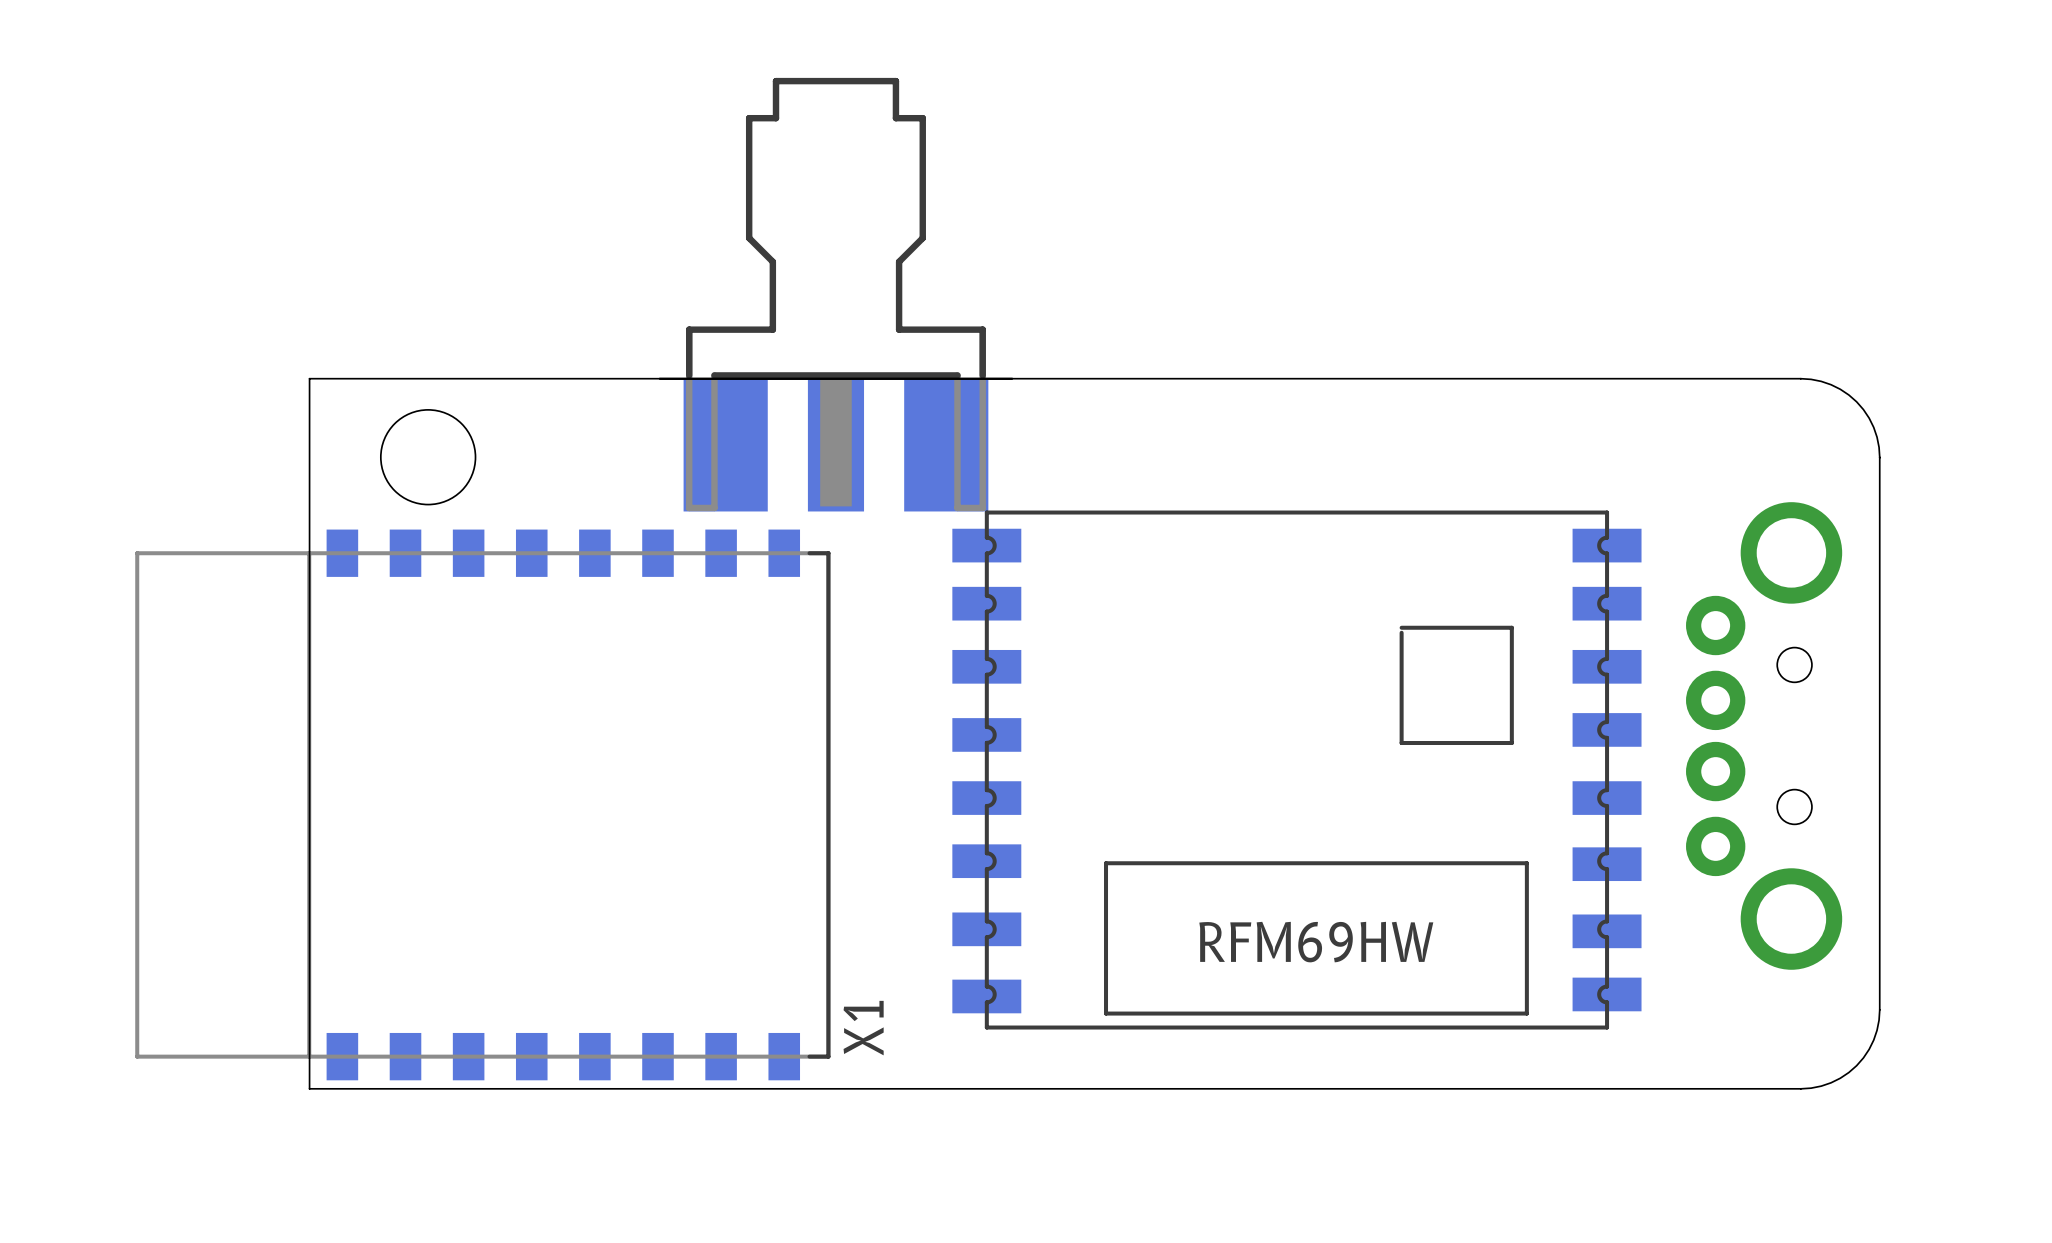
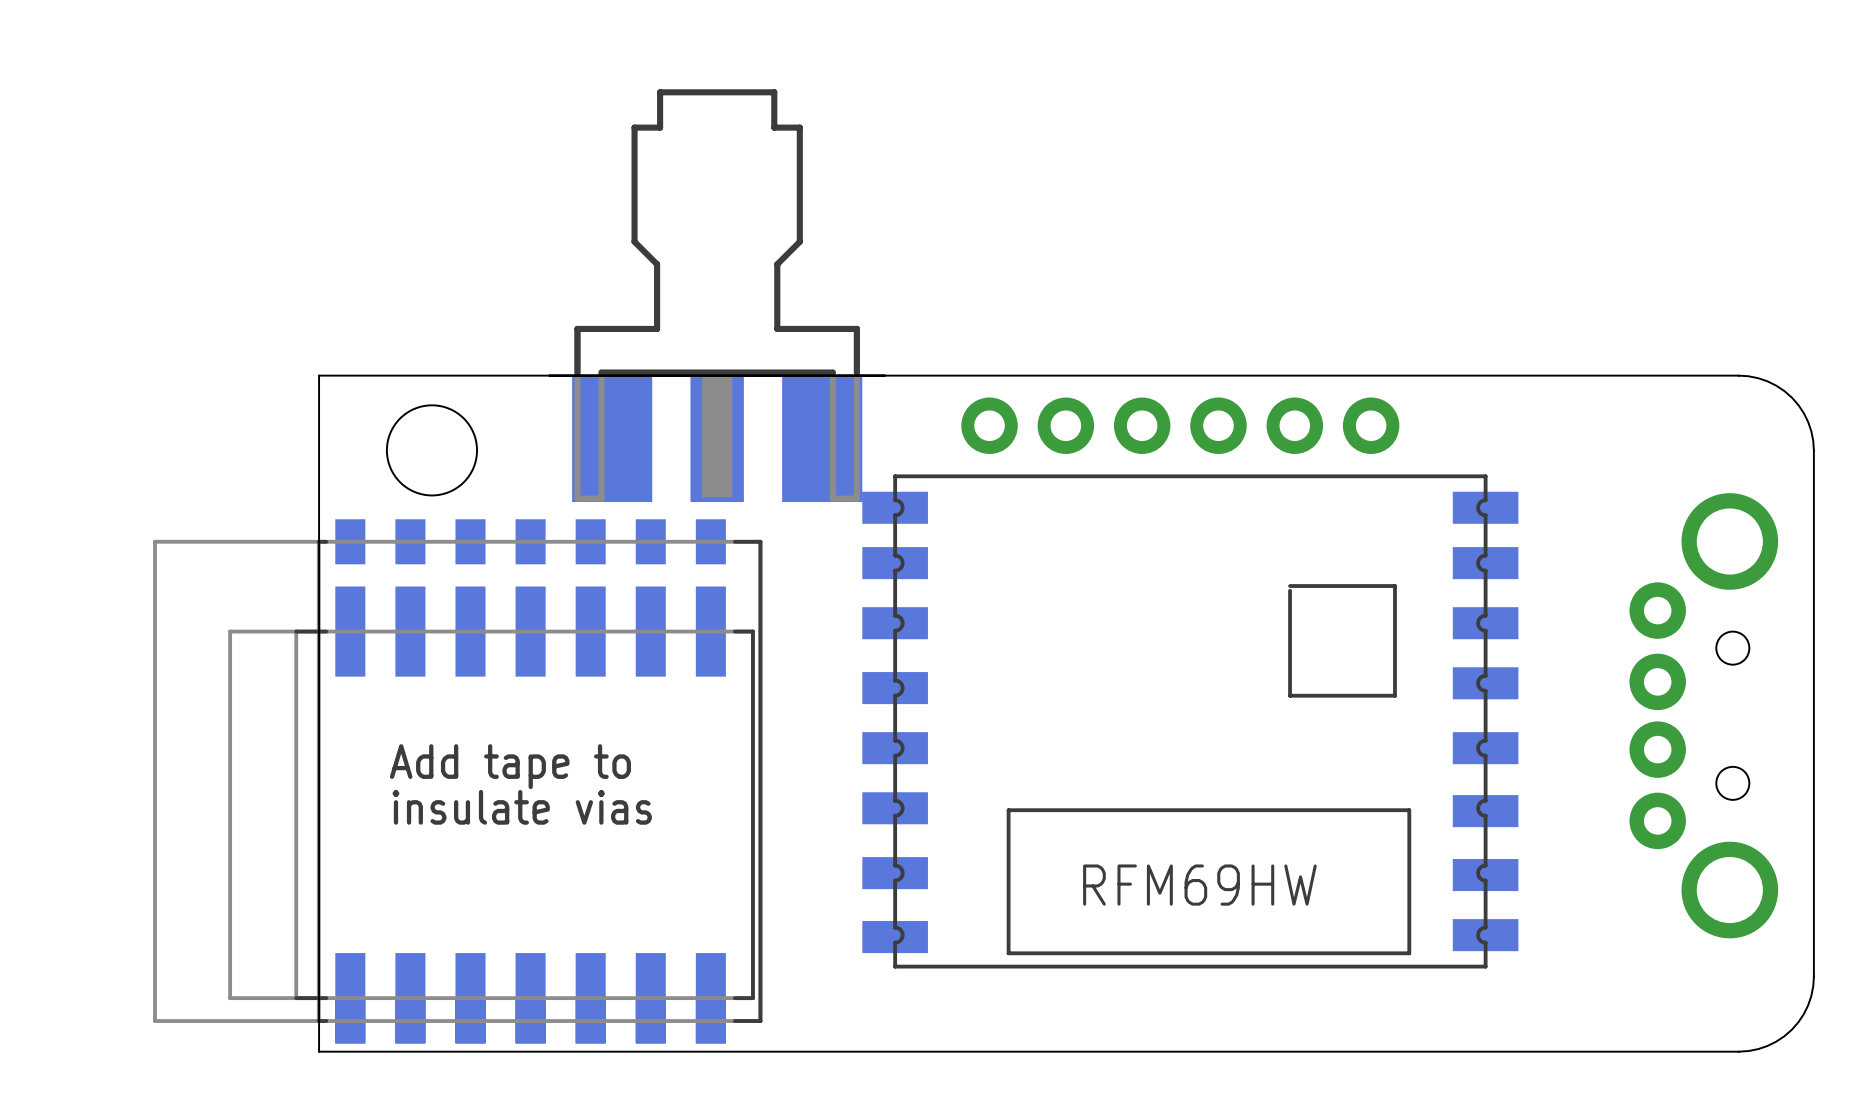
part position: (835, 294) -> (717, 295)
part: none -> (1180, 425)
part position: (1296, 770) -> (1190, 721)
text: none -> Add tape to (510, 766)
part: none -> (457, 781)
X1: (482, 804) -> none
text: none -> insulate vias (522, 807)
part: none -> (491, 814)

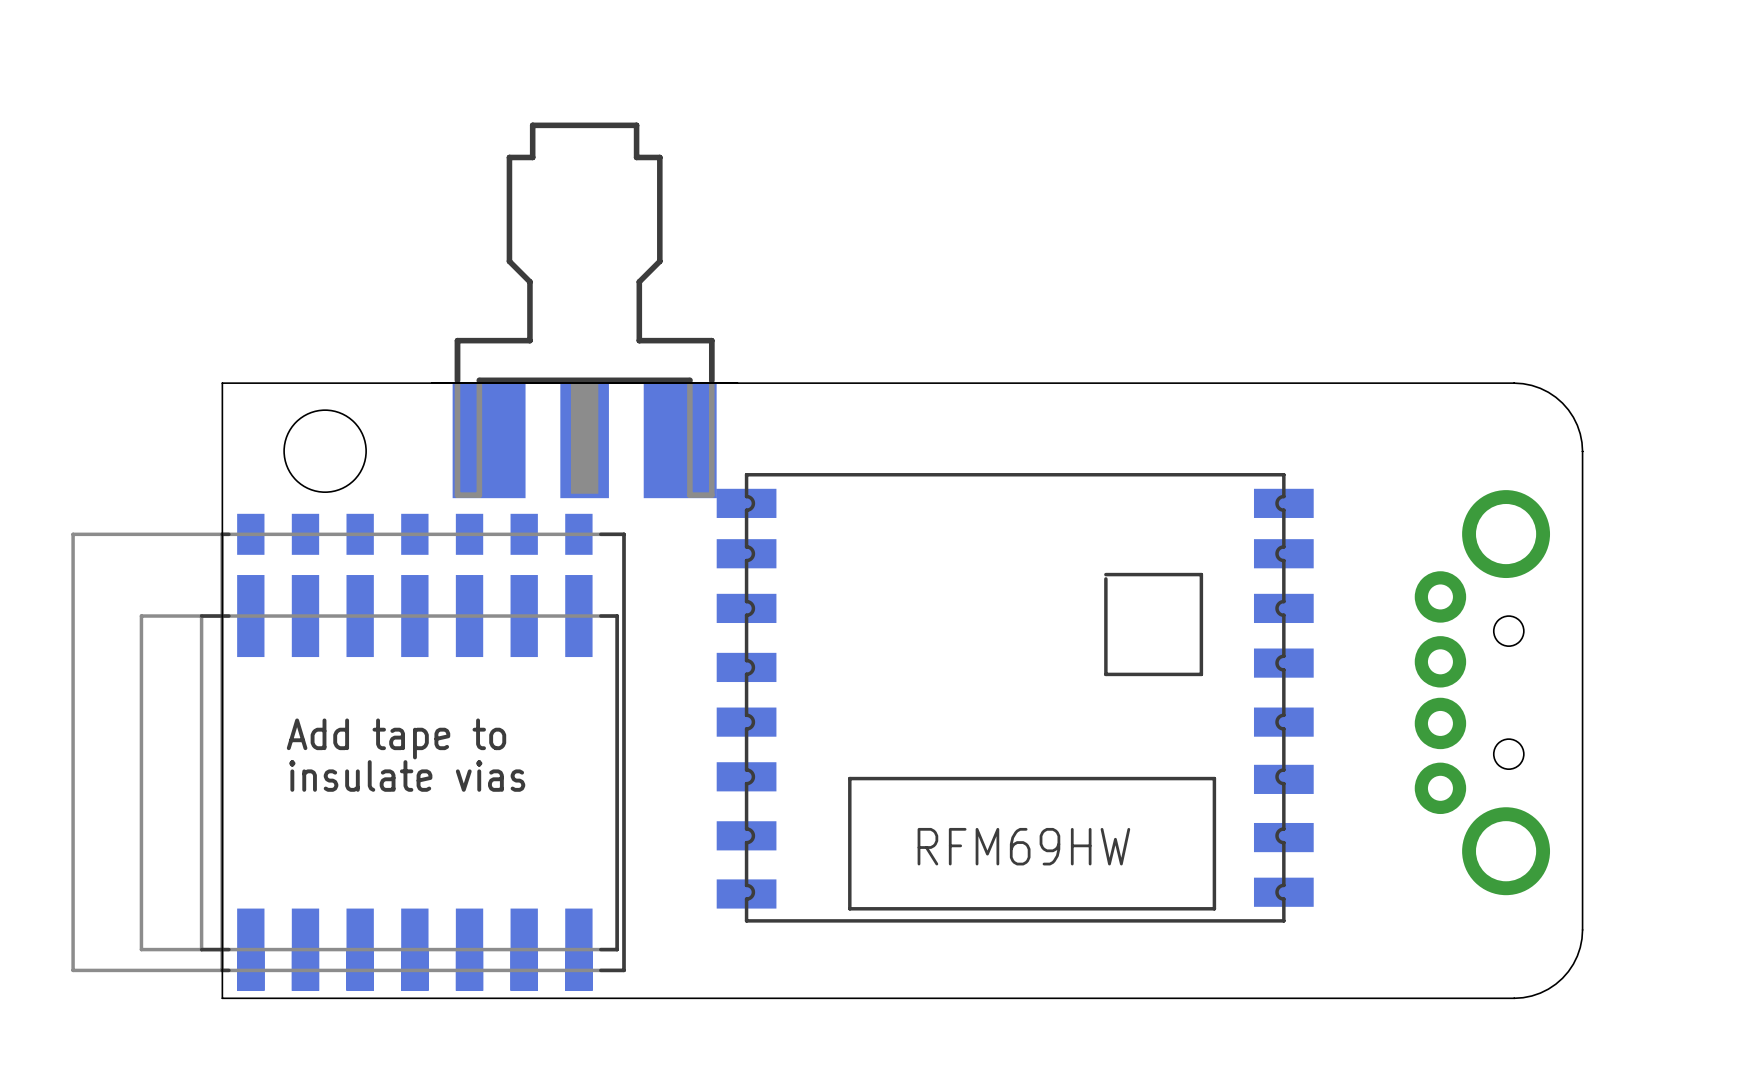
part: (1180, 425) -> none

